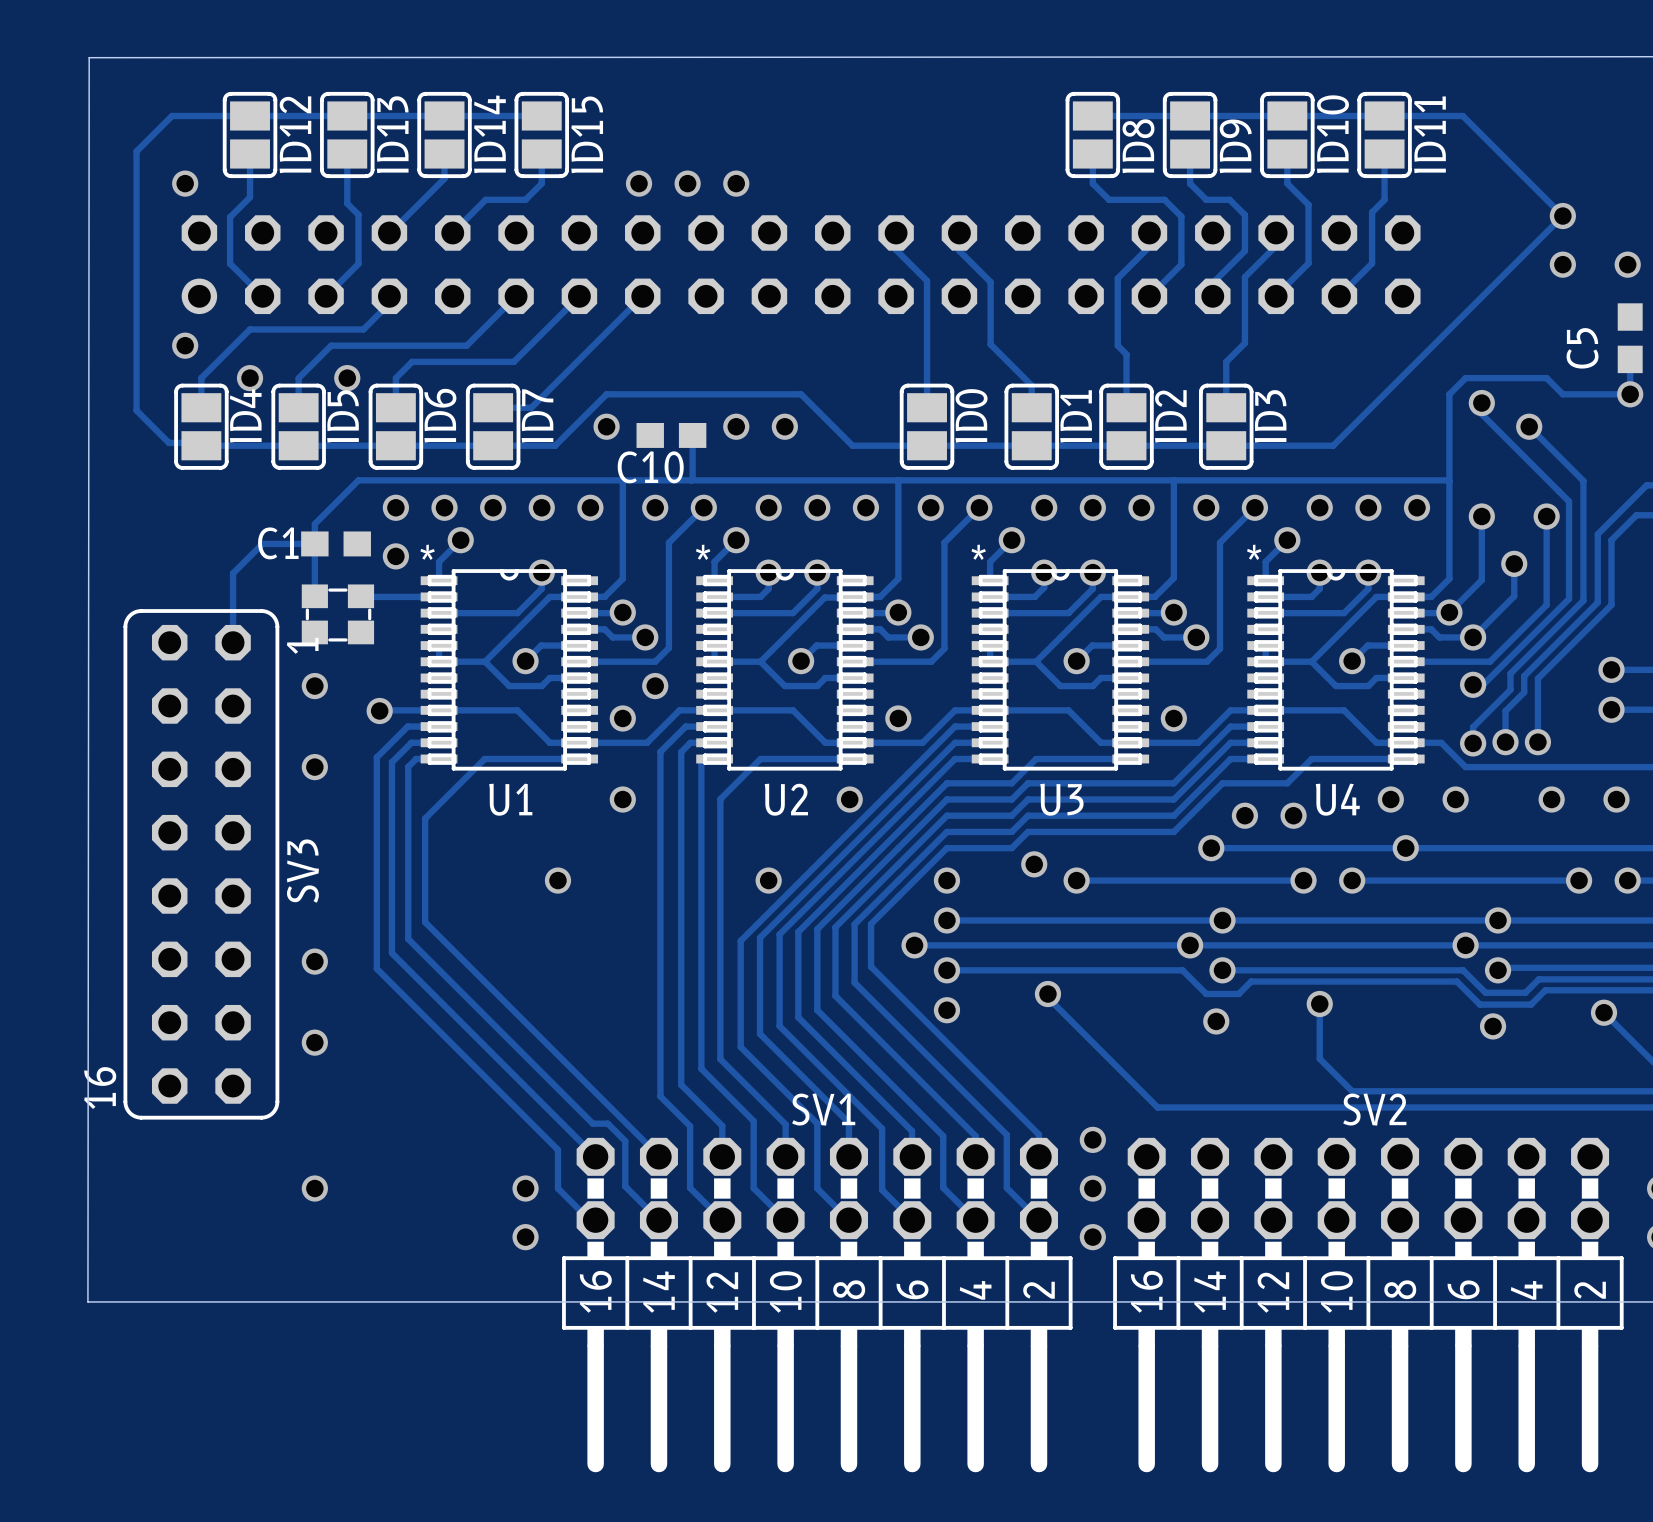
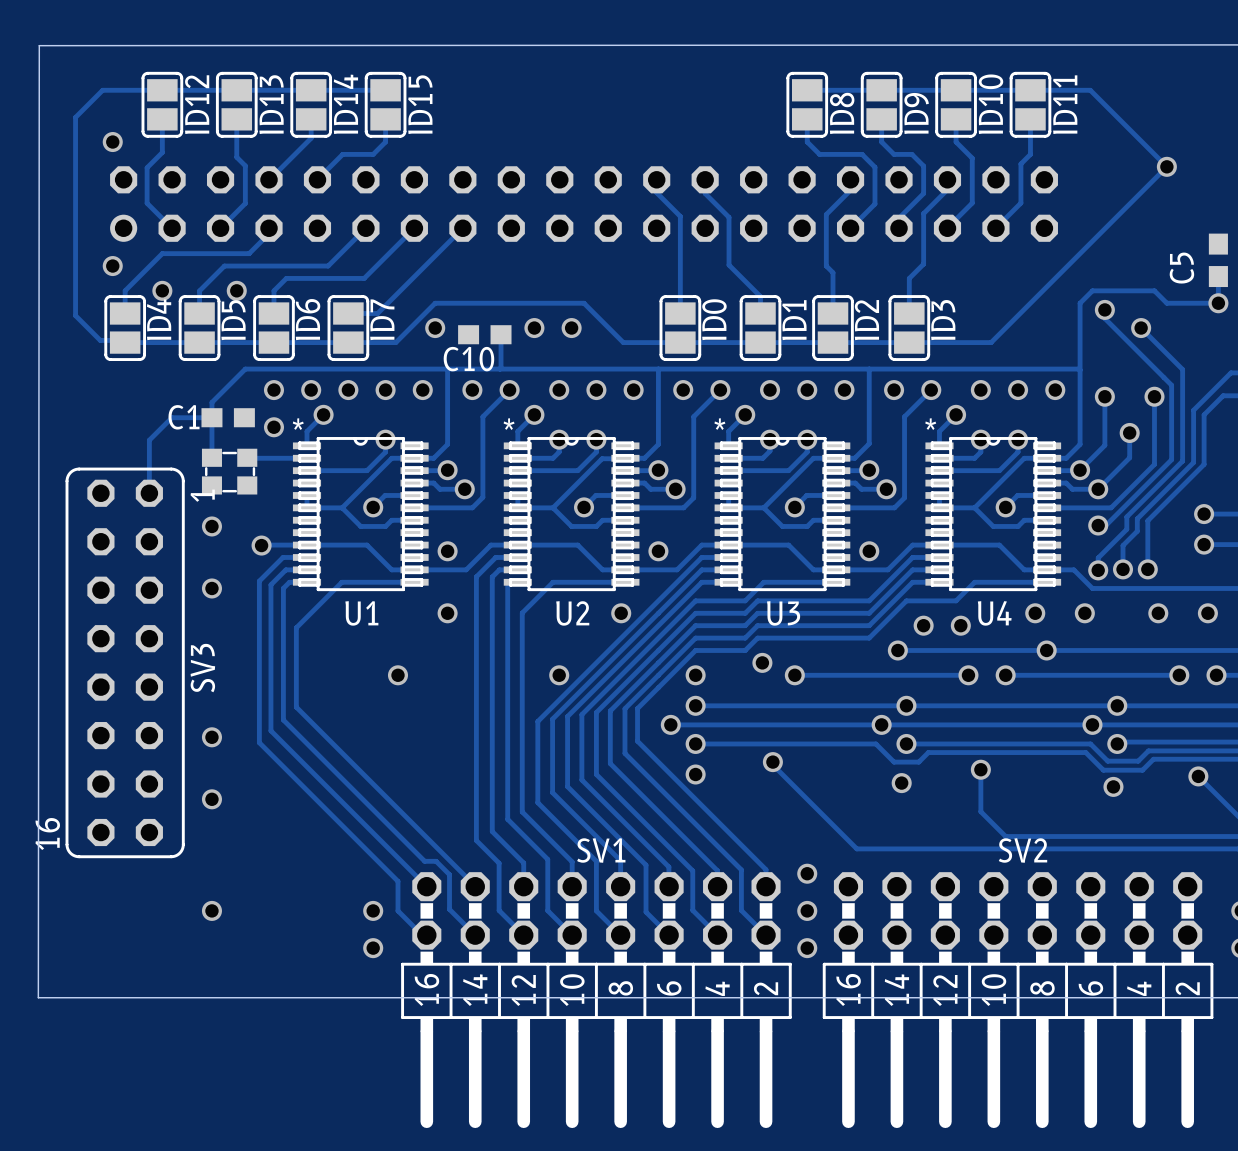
via: (639, 183) -> none
via: (687, 183) -> none
via: (736, 183) -> none
via: (1562, 264) -> none
via: (1627, 264) -> none
via: (655, 686) -> none

